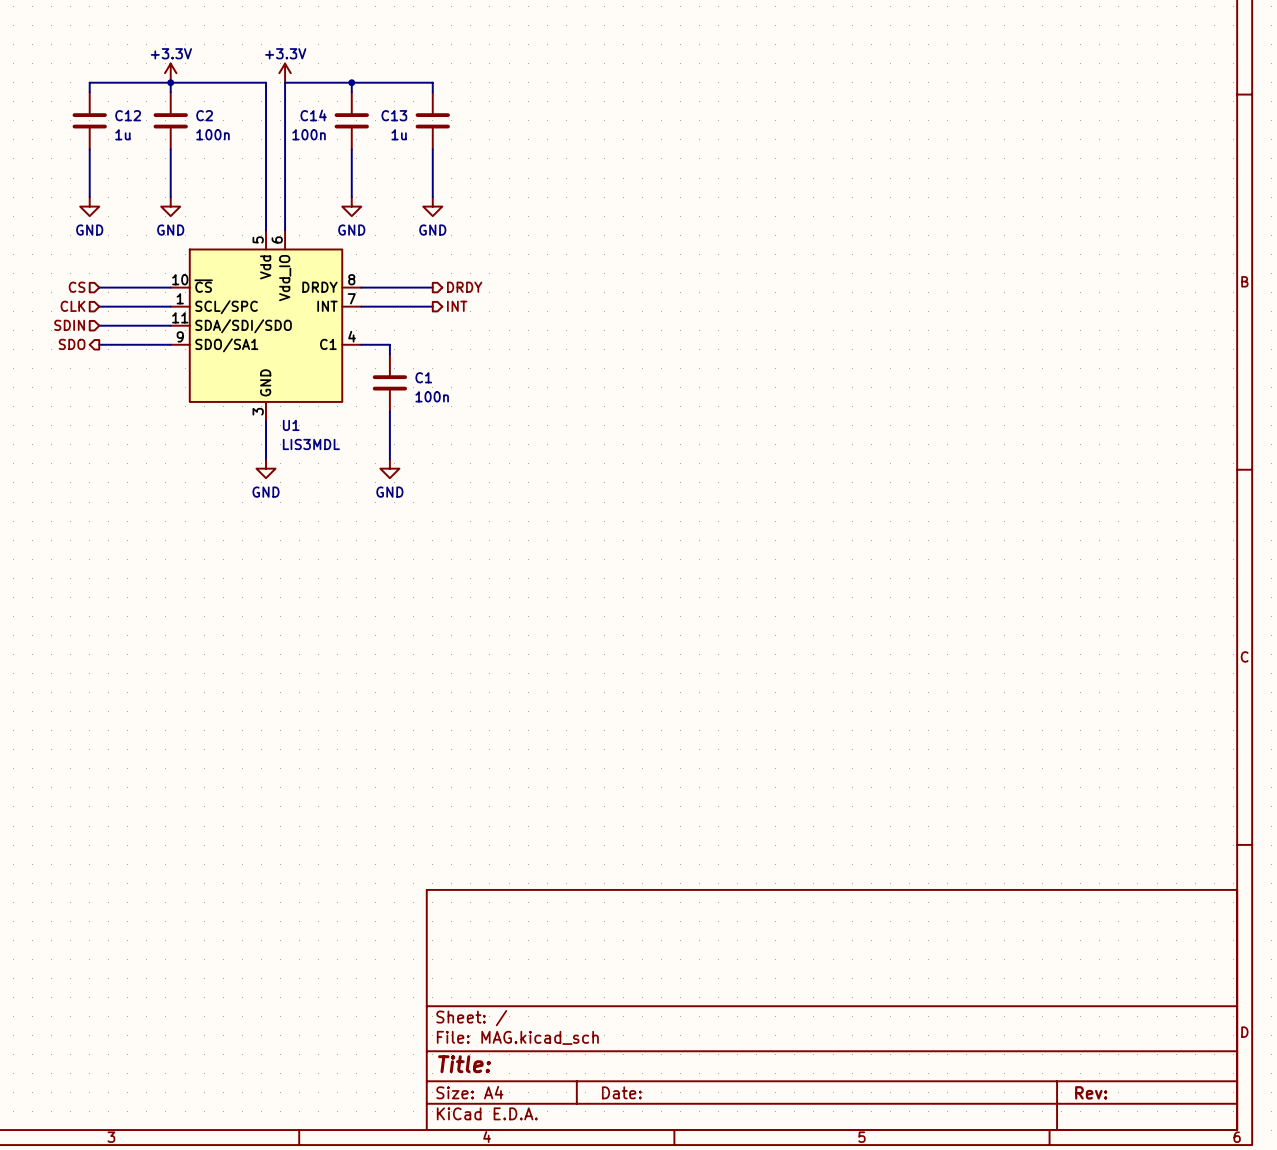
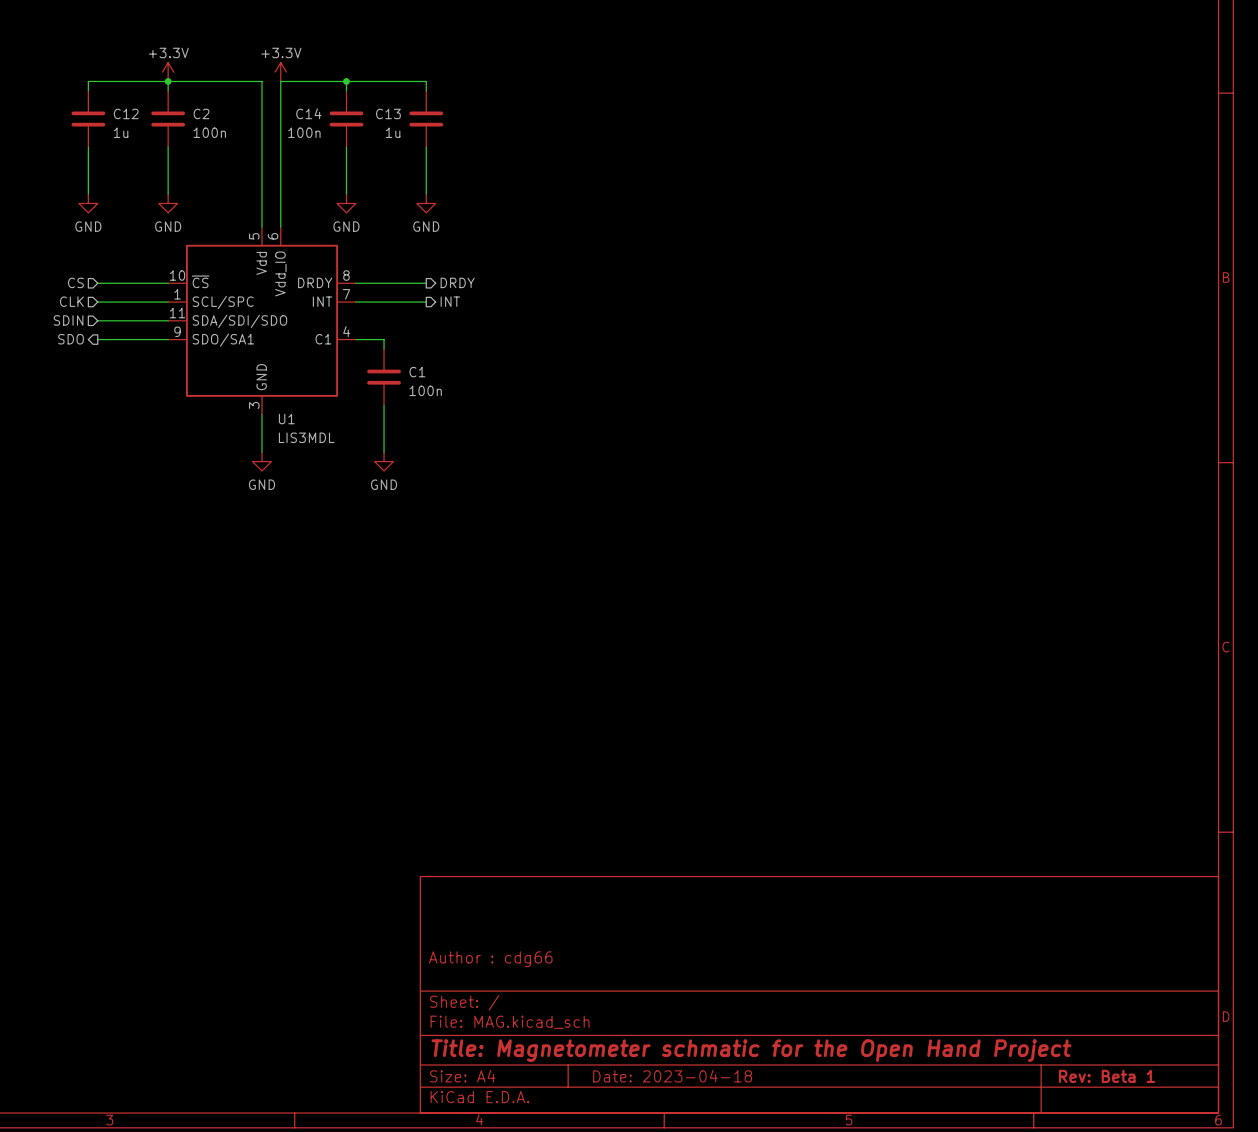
title block: none -> Author : cdg66 (490, 959)
title block: Title: (464, 1064) -> Title: Magnetometer schmatic for the Open Hand Project (751, 1050)
title block: Date: (621, 1092) -> Date: 2023-04-18 (672, 1076)
title block: Rev: (1091, 1092) -> Rev: Beta 1 (1107, 1076)

